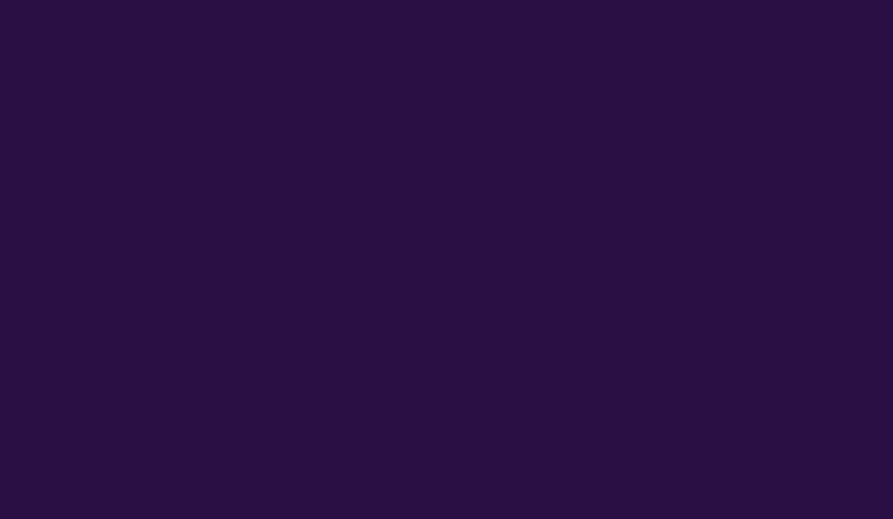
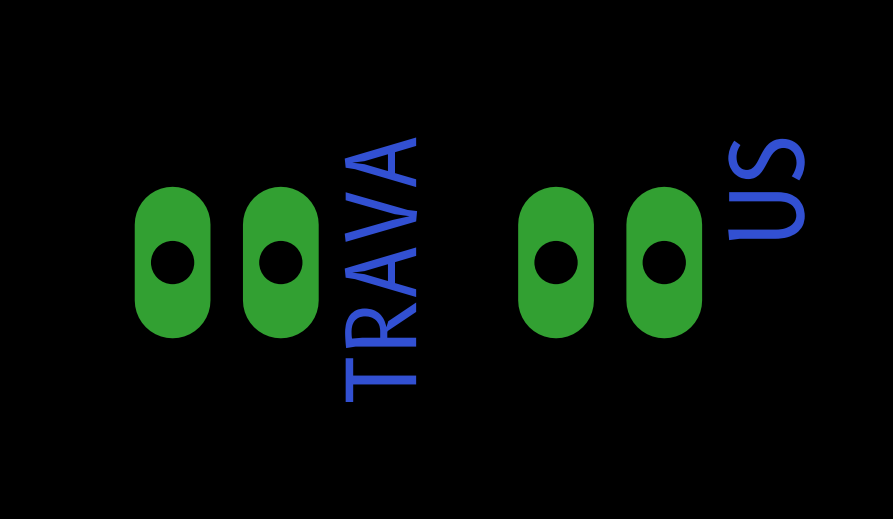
text: none -> US (766, 189)
part: none -> (226, 262)
part: none -> (610, 262)
text: none -> TRAVA (380, 269)

